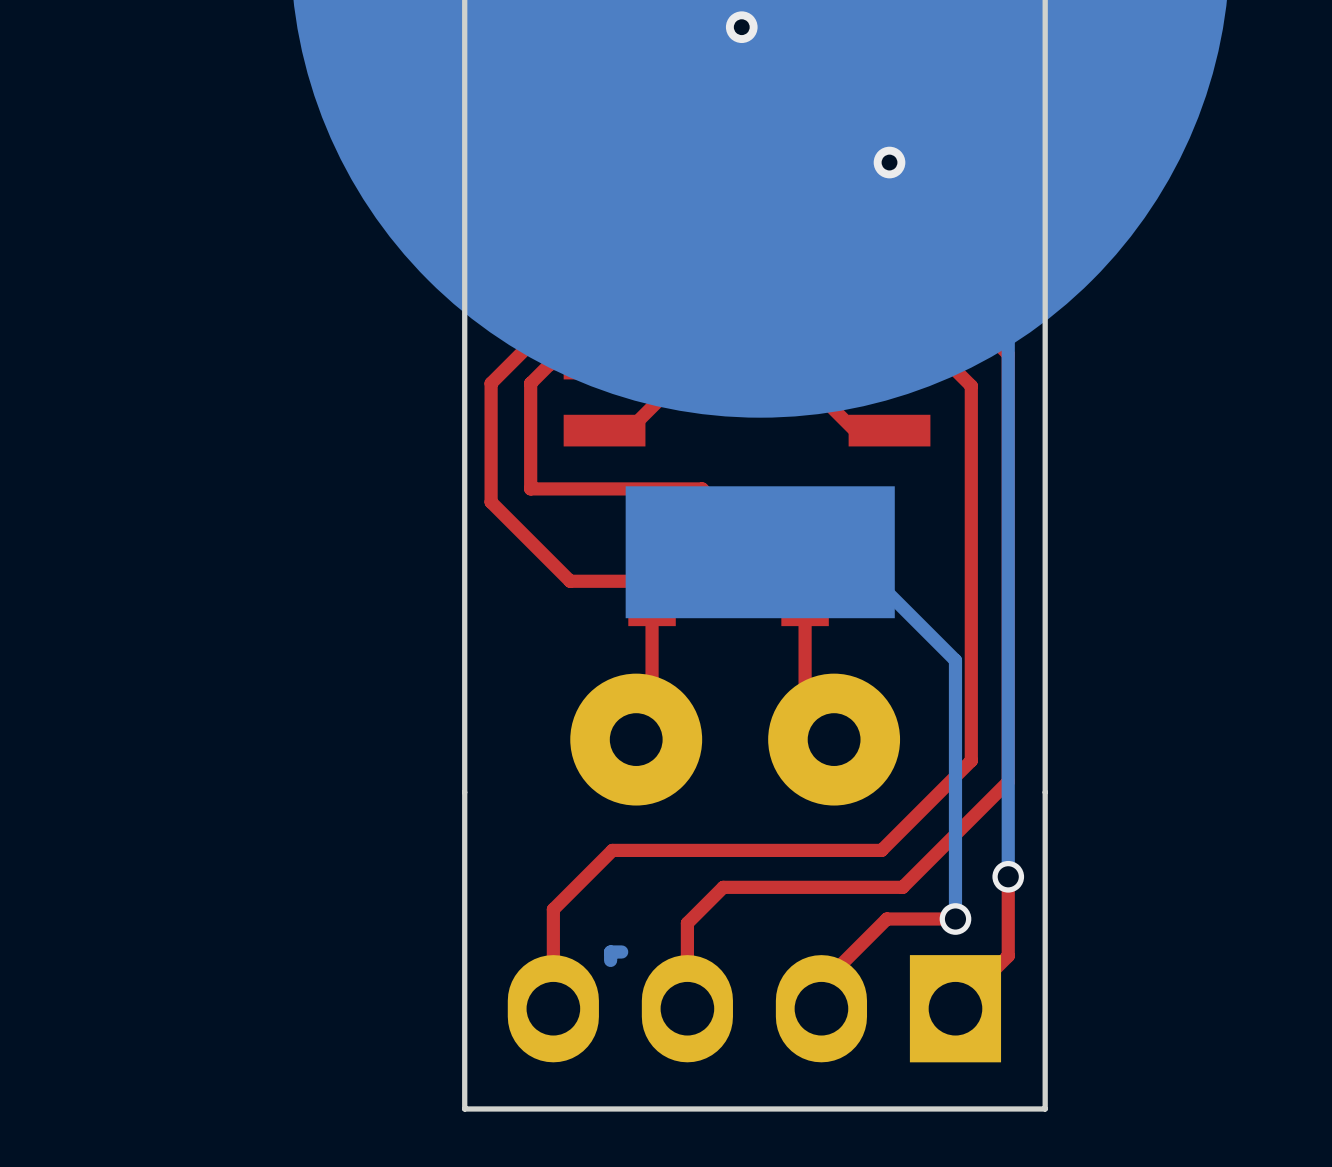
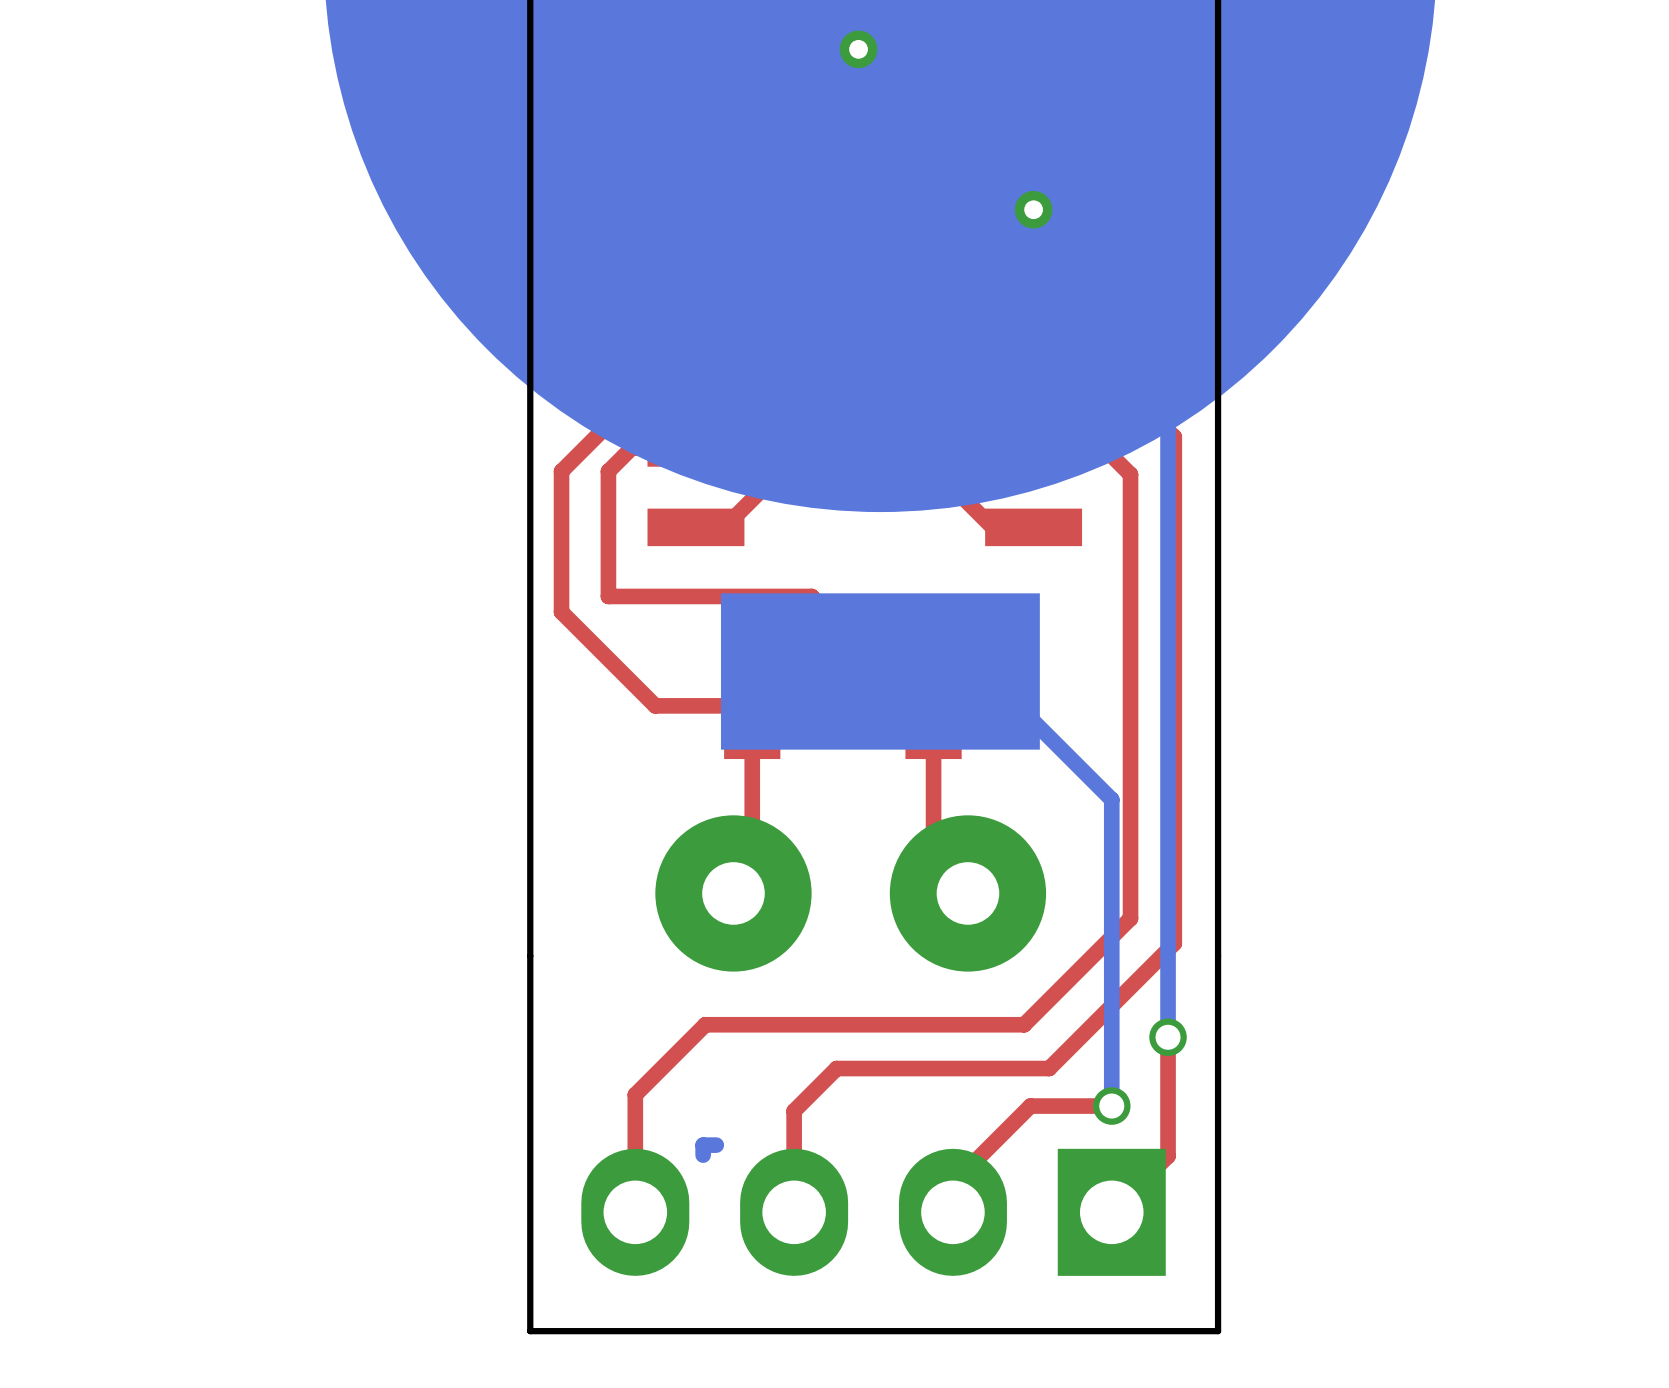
bottom track: (1002, 190) (1008, 196) (1008, 876) -> (1168, 243) (1168, 1037)
top track: (1008, 876) (1008, 955) (1002, 961) -> (1168, 1037) (1168, 1156)
via position: (1008, 876) -> (1168, 1037)

